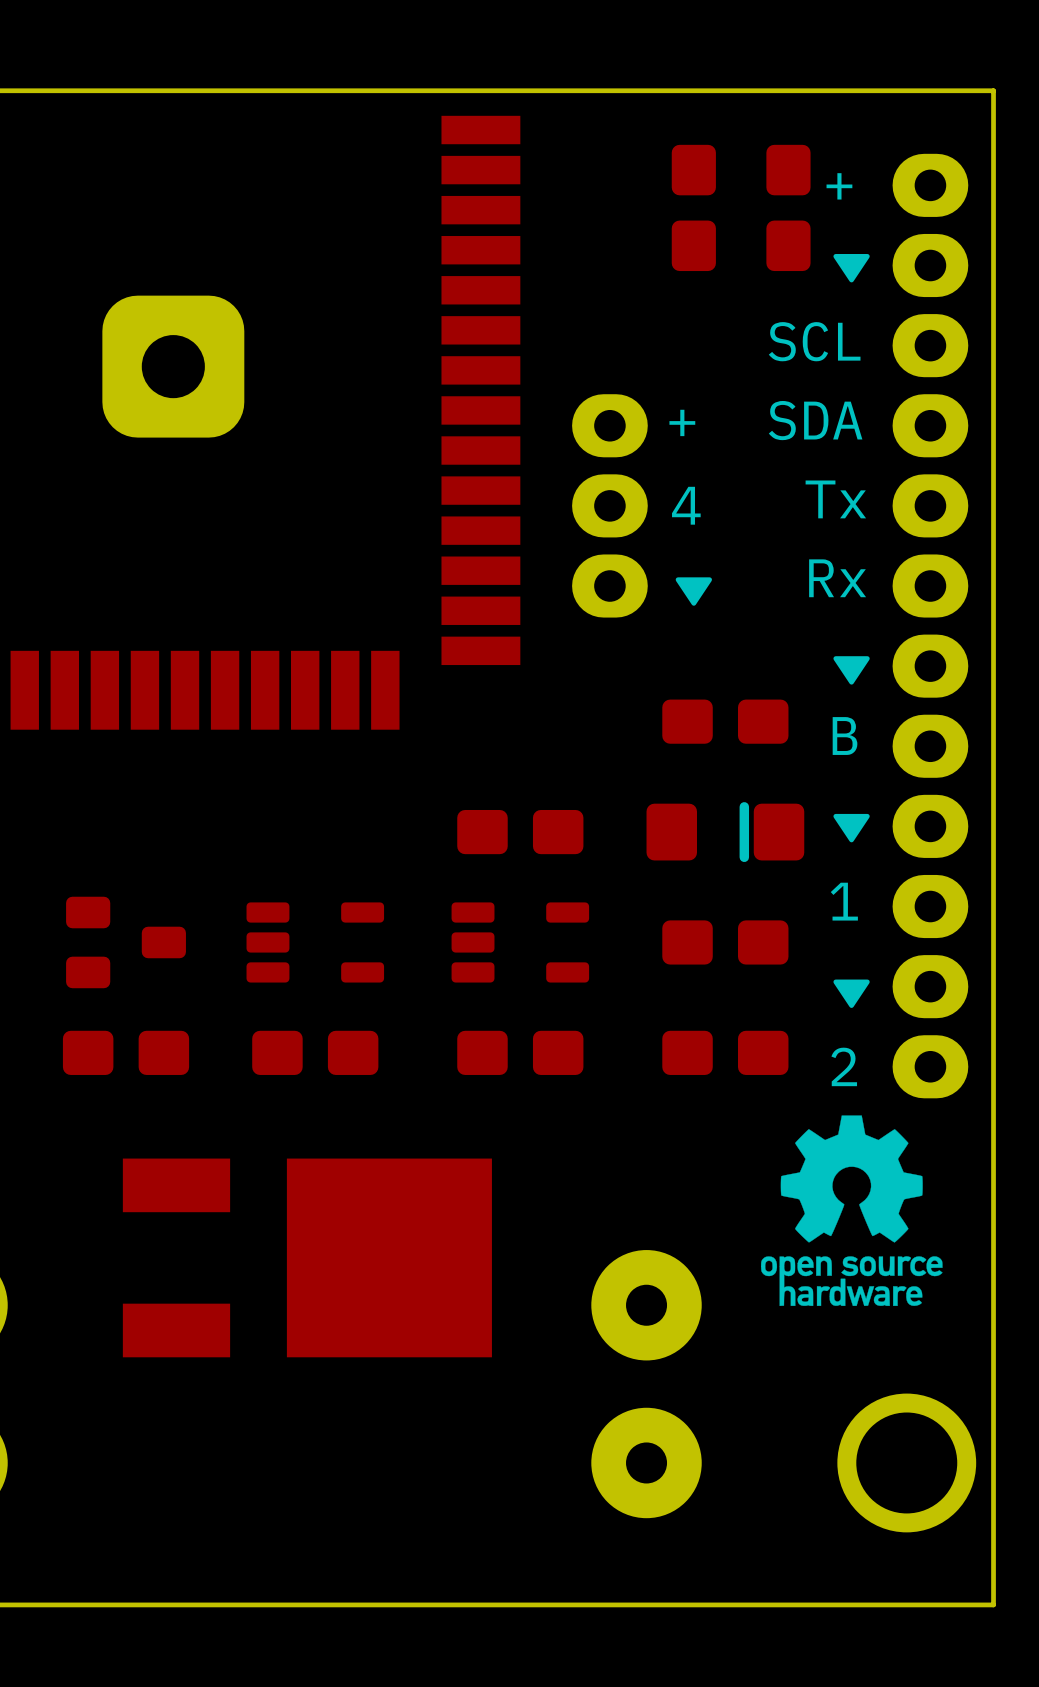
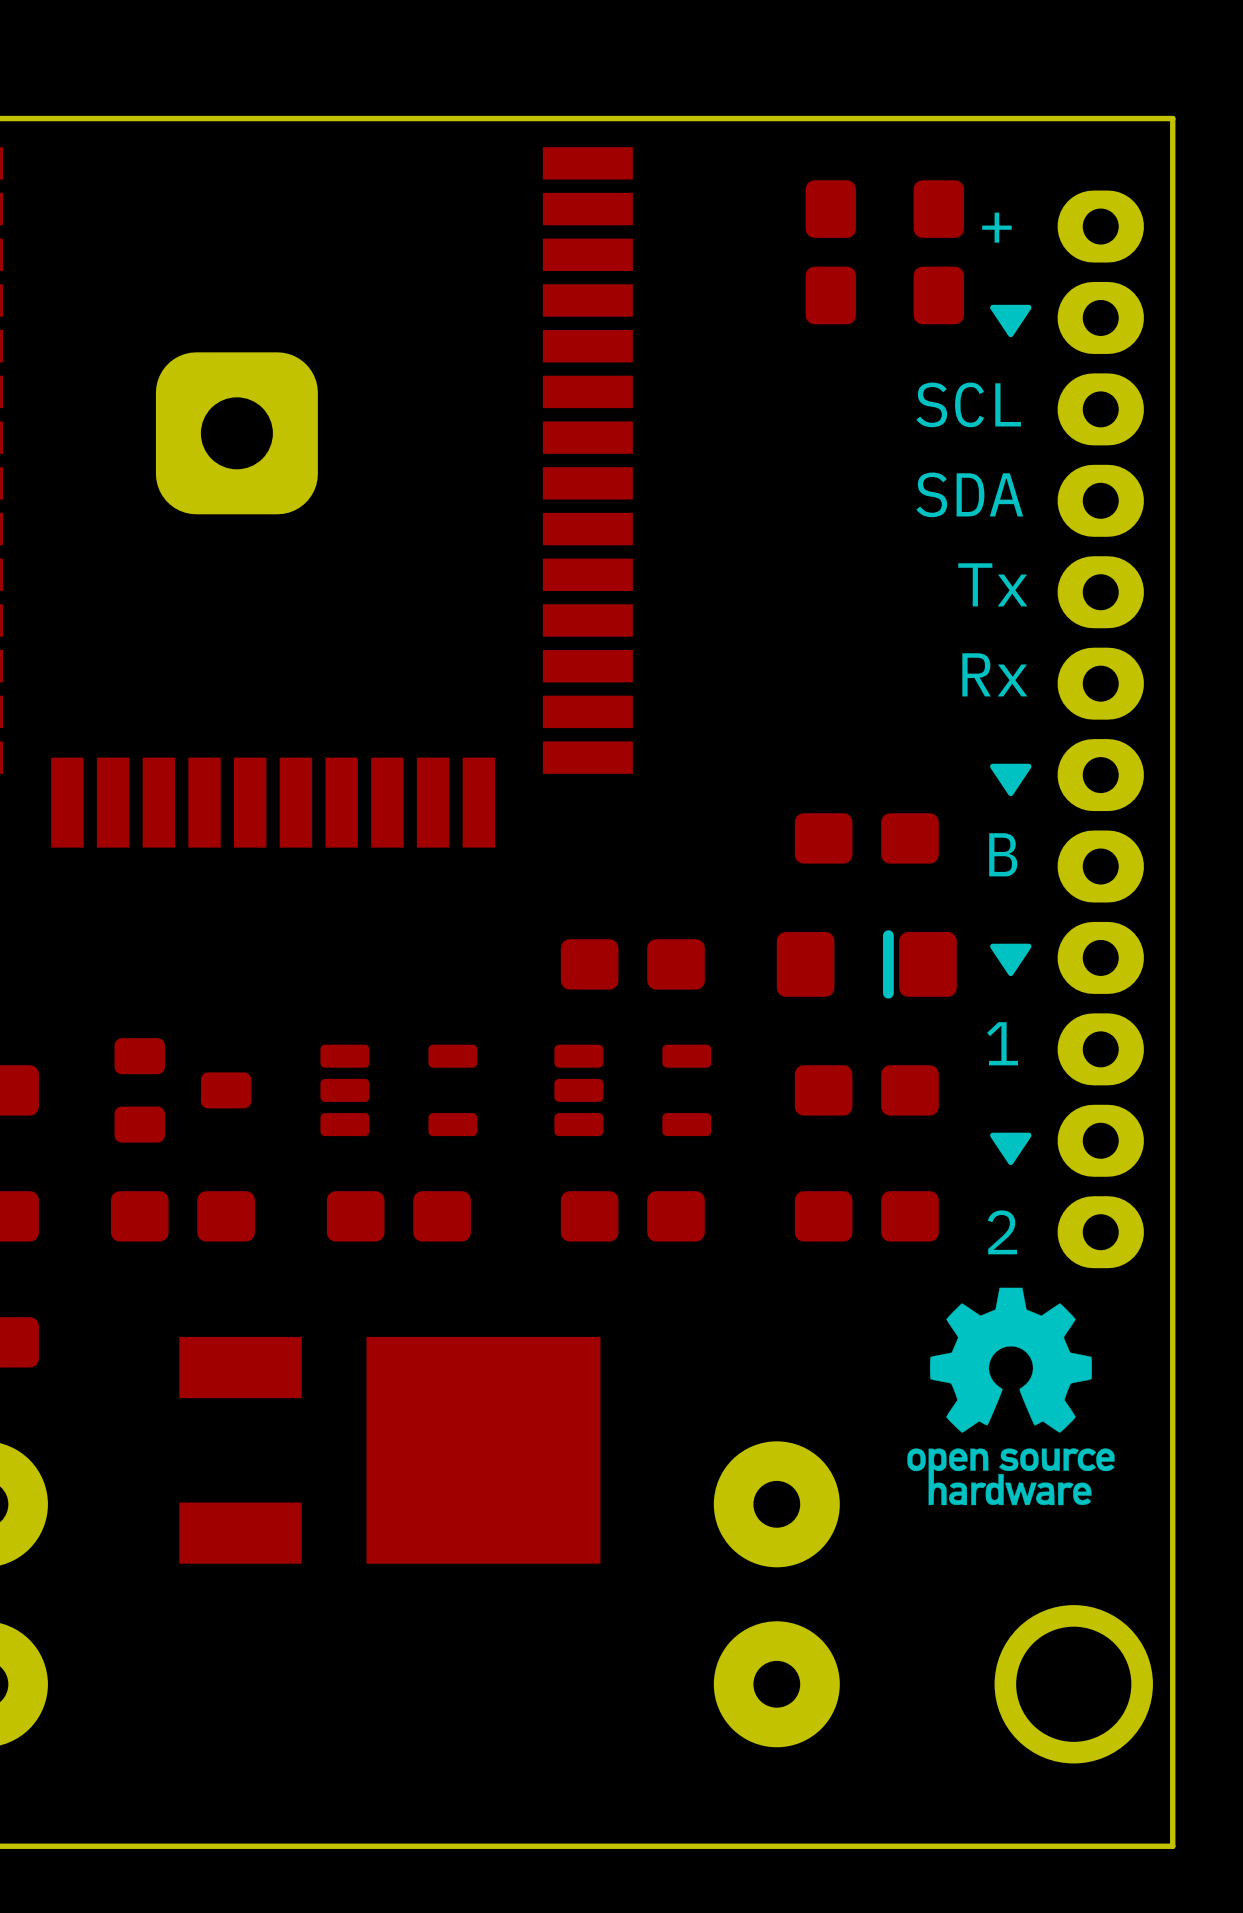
text: + (682, 422) -> none
part: (609, 505) -> none
text: 4 (686, 505) -> none
drawing: [675, 577, 712, 606] -> none

